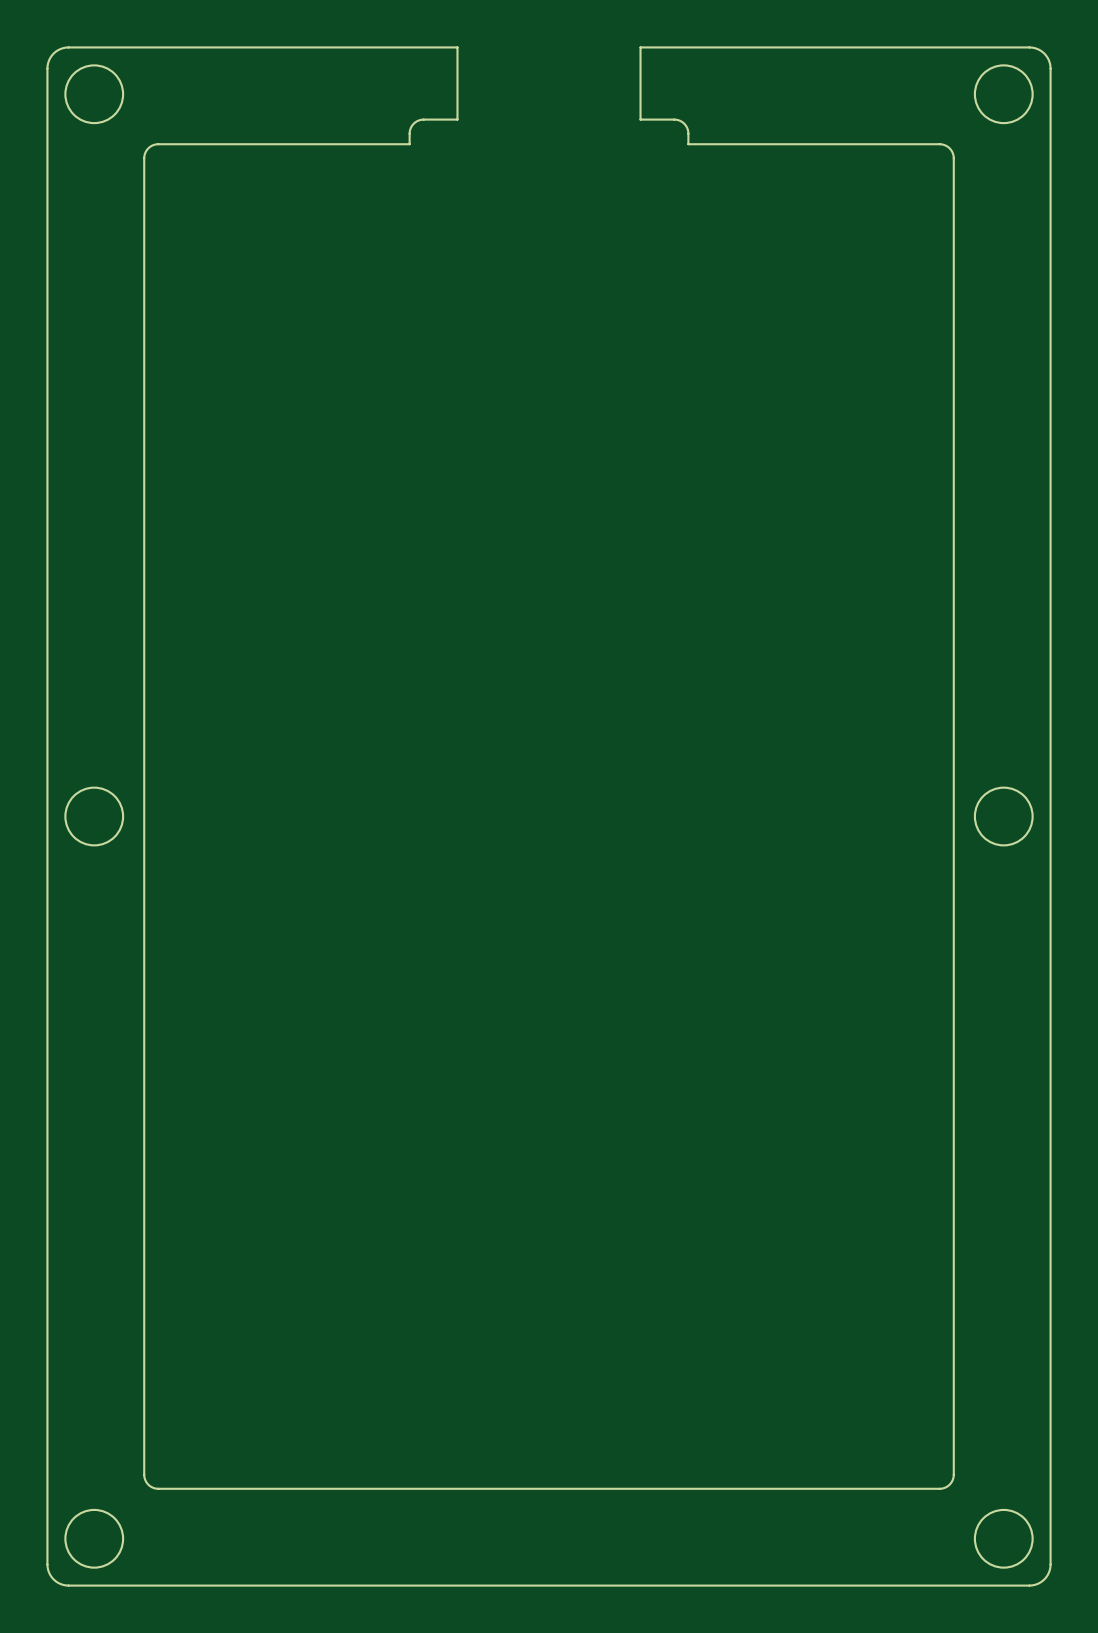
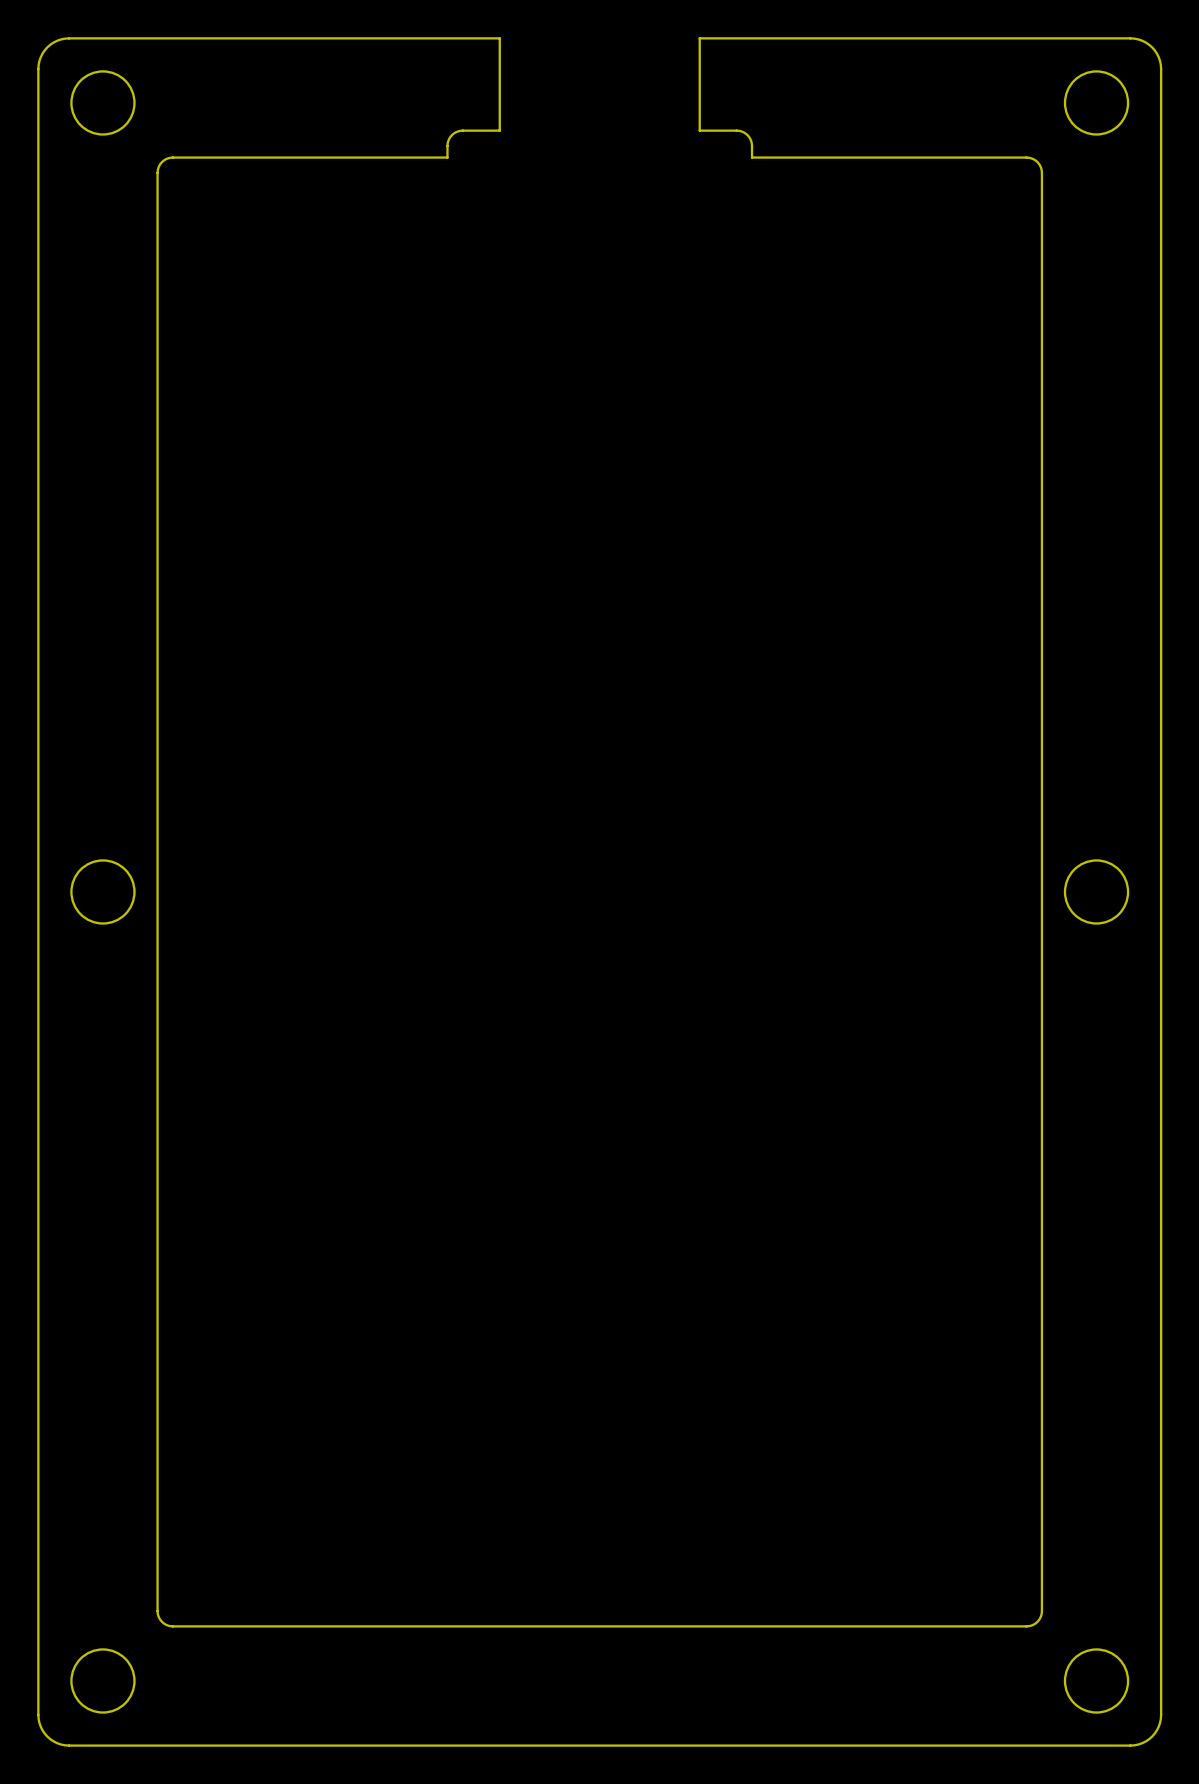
board edge: (640, 47) (1029, 47) (1042, 51) (1049, 63) (1050, 1564) (1046, 1577) (1034, 1584) (68, 1585) (55, 1581) (49, 1572) (47, 1564) (48, 63) (55, 51) (68, 47) (457, 47) -> (699, 51) (699, 38) (1130, 38) (1142, 40) (1149, 44) (1154, 50) (1160, 61) (1161, 1714) (1160, 1722) (1154, 1733) (1149, 1739) (1138, 1744) (69, 1745) (57, 1743) (50, 1739) (40, 1726) (38, 1714) (39, 61) (42, 53) (50, 44) (57, 40) (69, 38) (499, 38) (499, 51)

